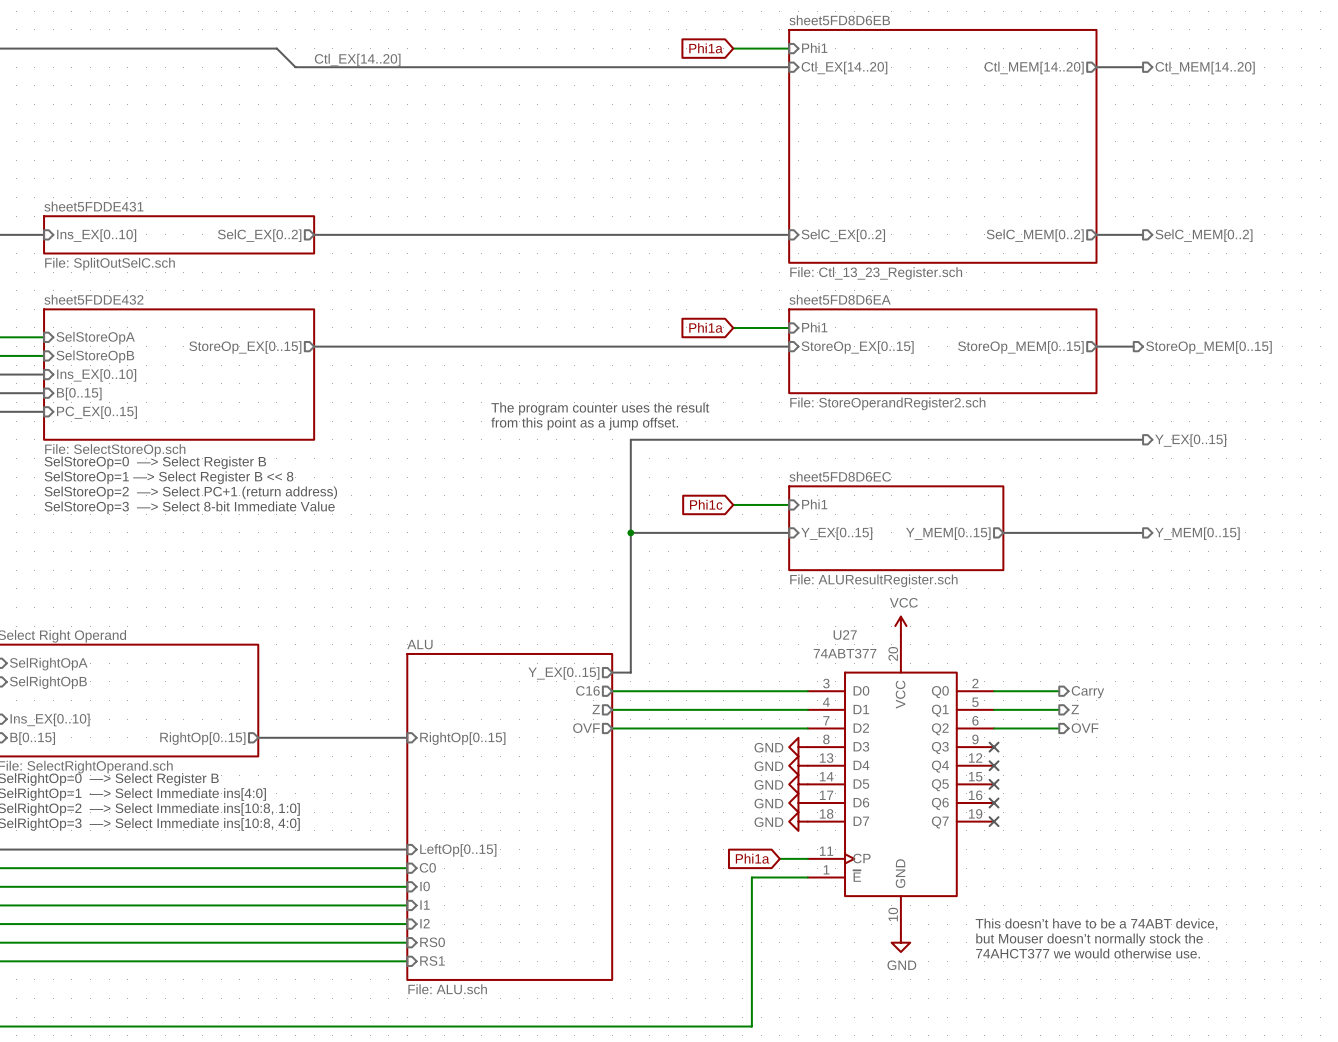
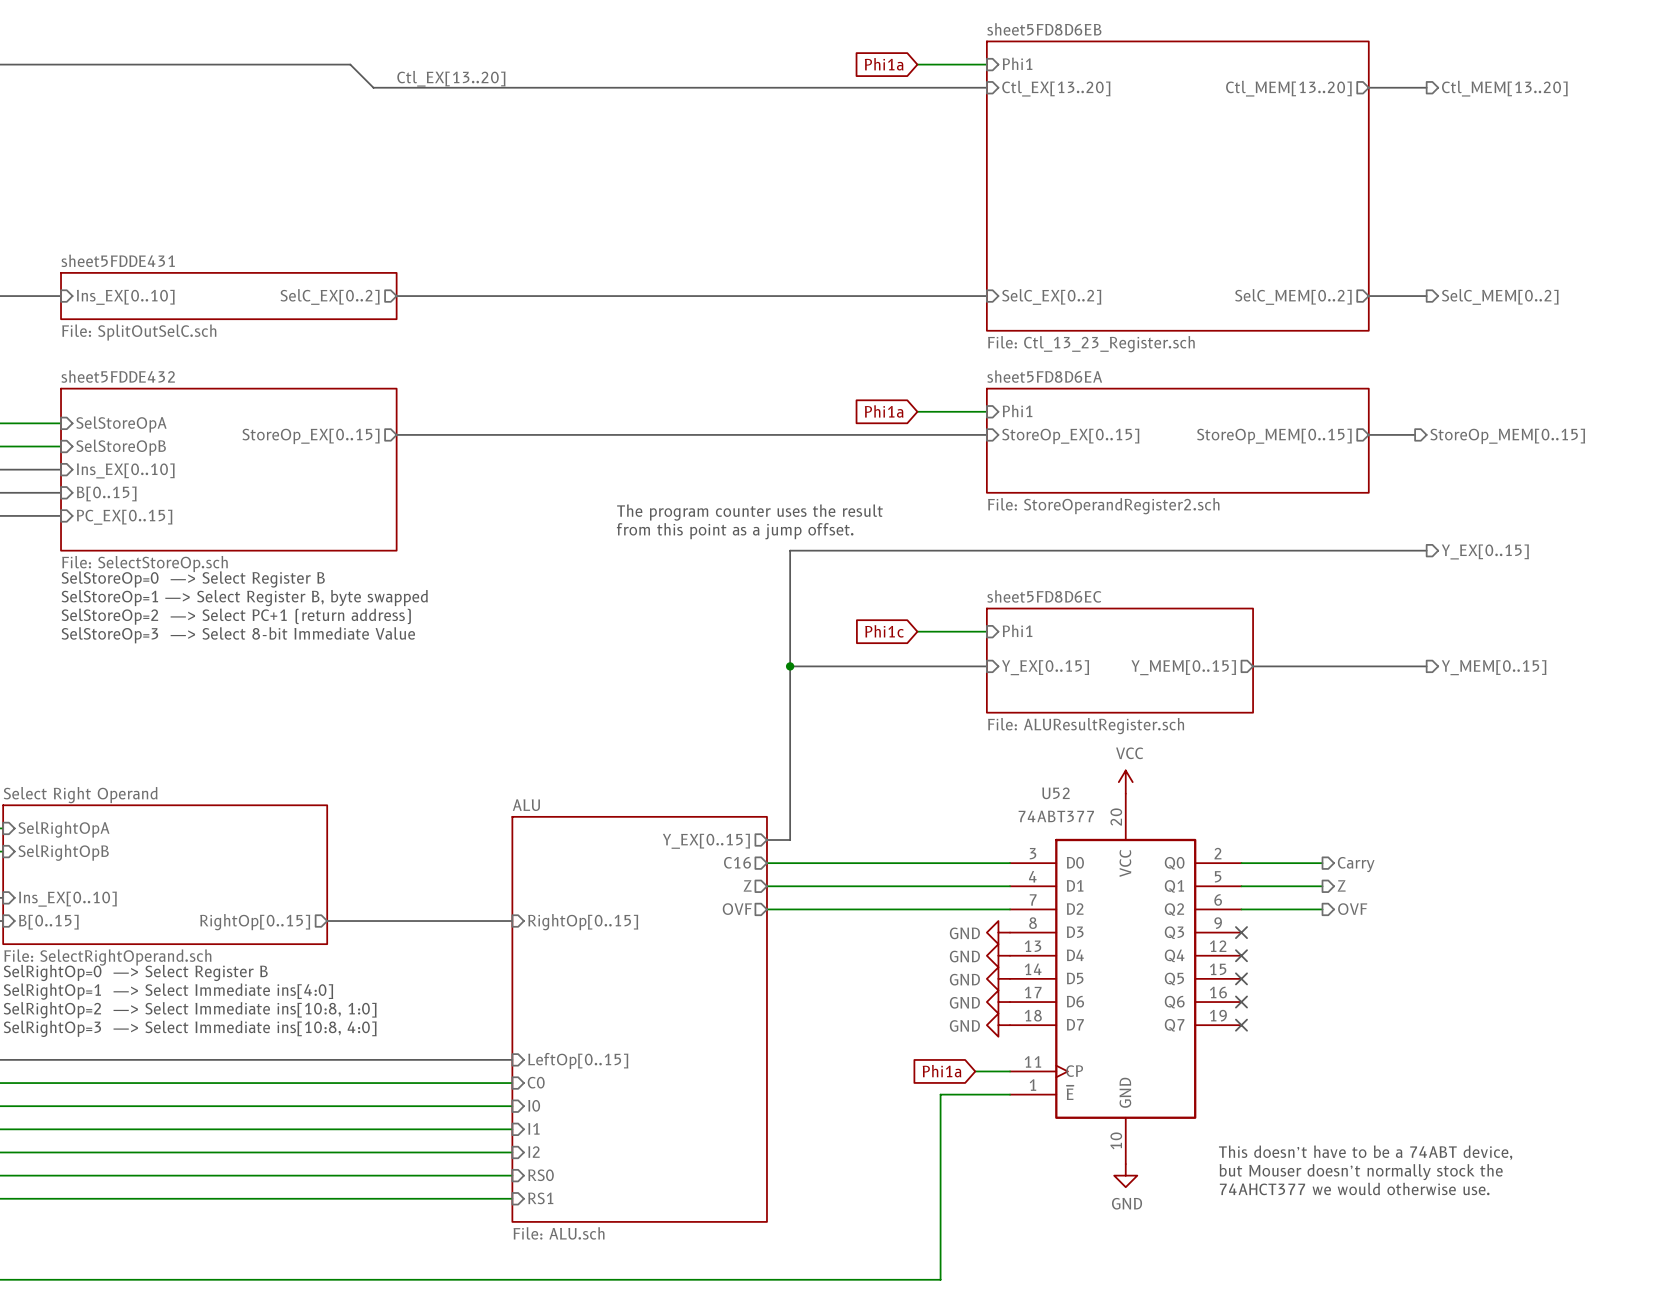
label: Ctl_EX[14..20] (357, 60) -> Ctl_EX[13..20] (451, 78)
sheet pin: Ctl_EX[14..20] (844, 68) -> Ctl_EX[13..20] (1056, 88)
sheet pin: Ctl_MEM[14..20] (1034, 68) -> Ctl_MEM[13..20] (1288, 88)
hierarchical label: Ctl_MEM[14..20] (1205, 68) -> Ctl_MEM[13..20] (1504, 88)
text: SelStoreOp=1 —> Select Register B << 8 (168, 477) -> SelStoreOp=1 —> Select Register B, byte swapped (244, 598)
U27 name: U27 (845, 634) -> U52 (1055, 793)

